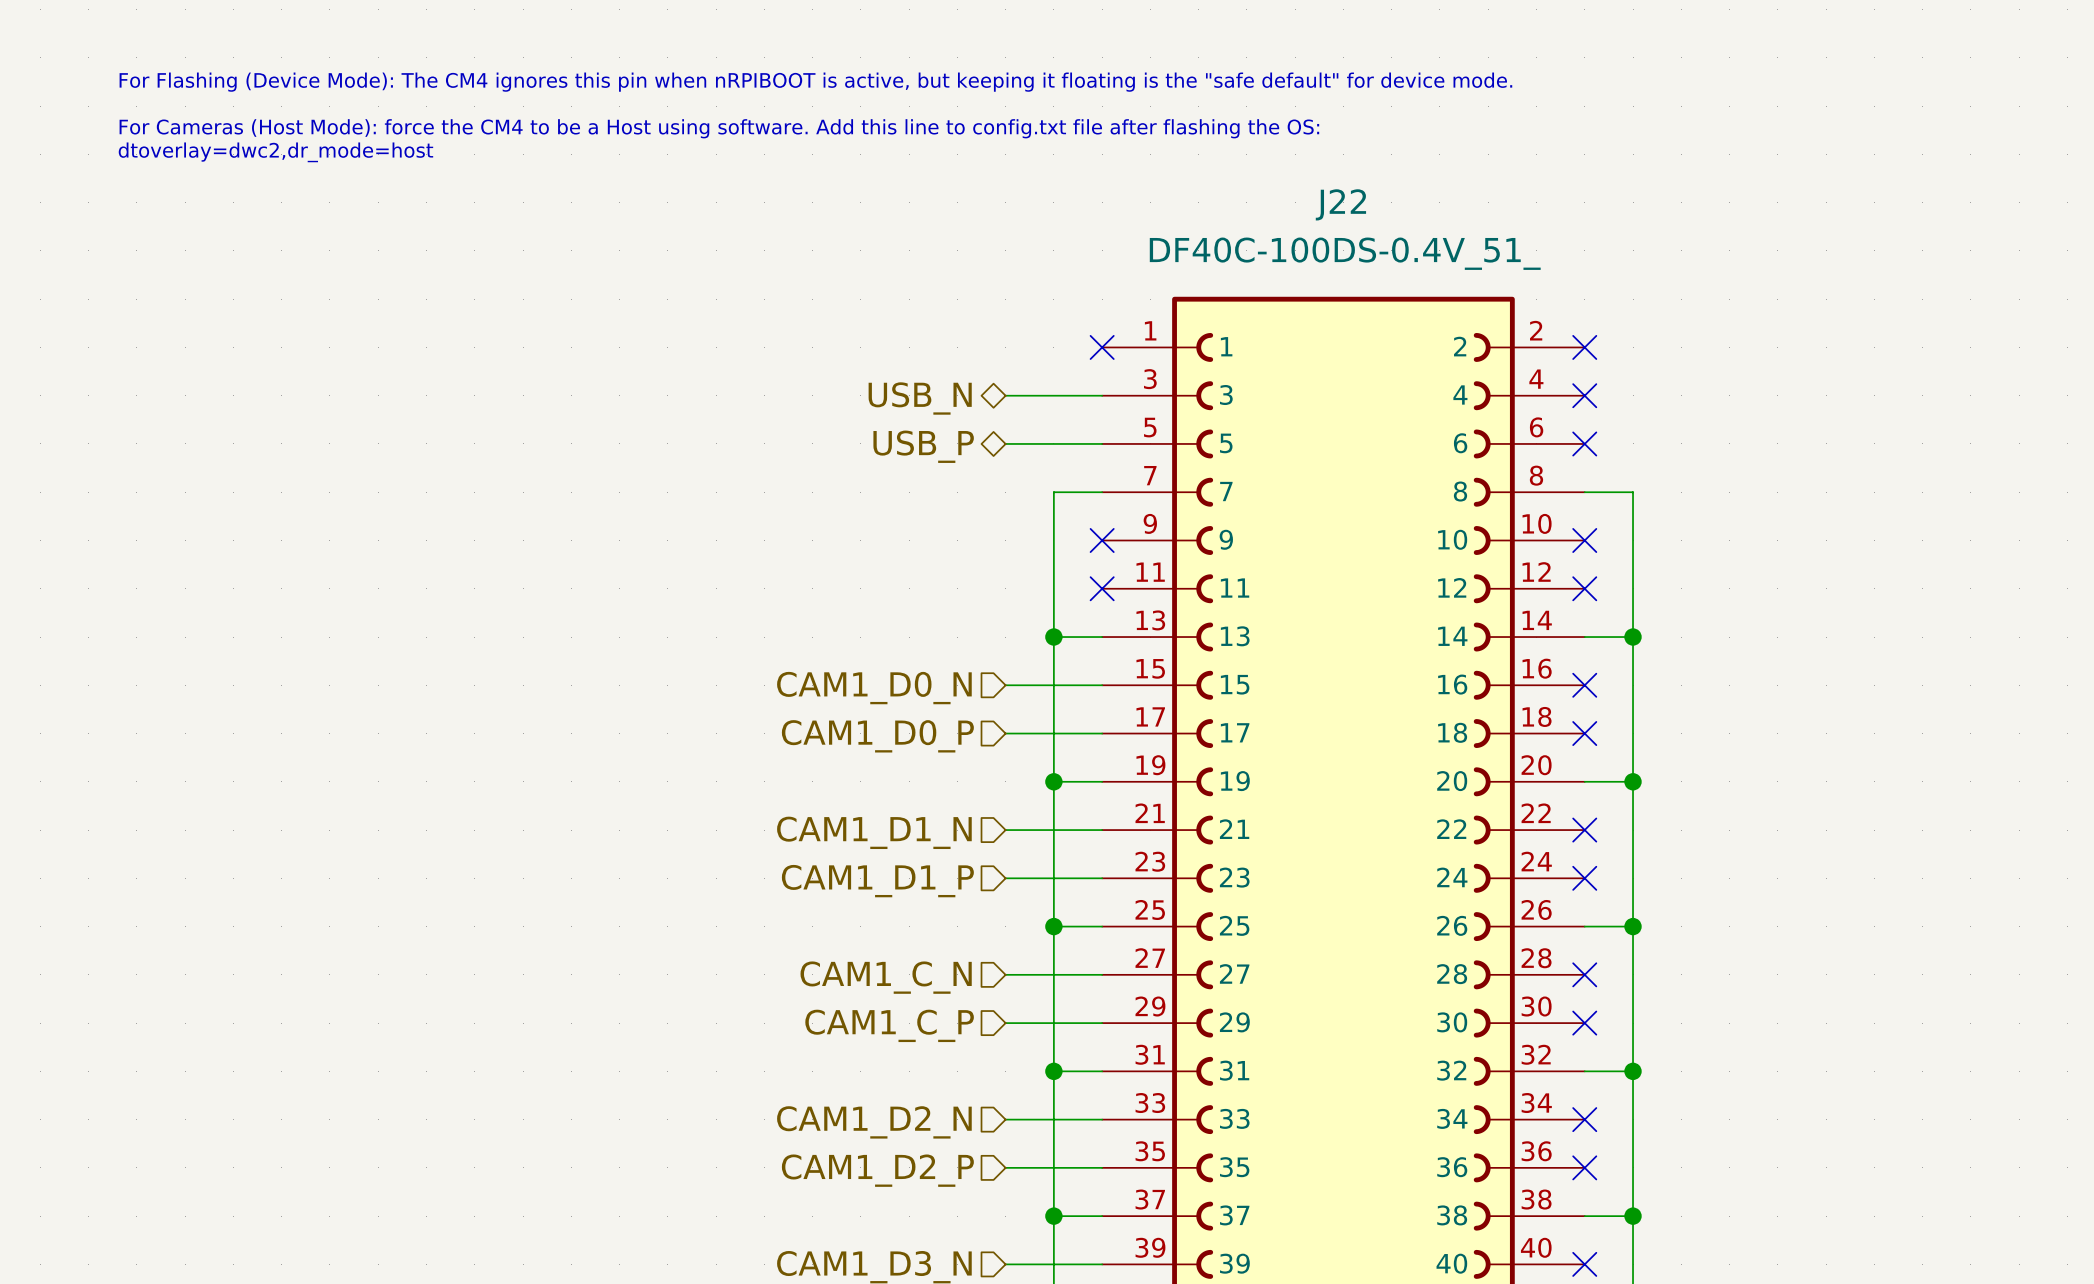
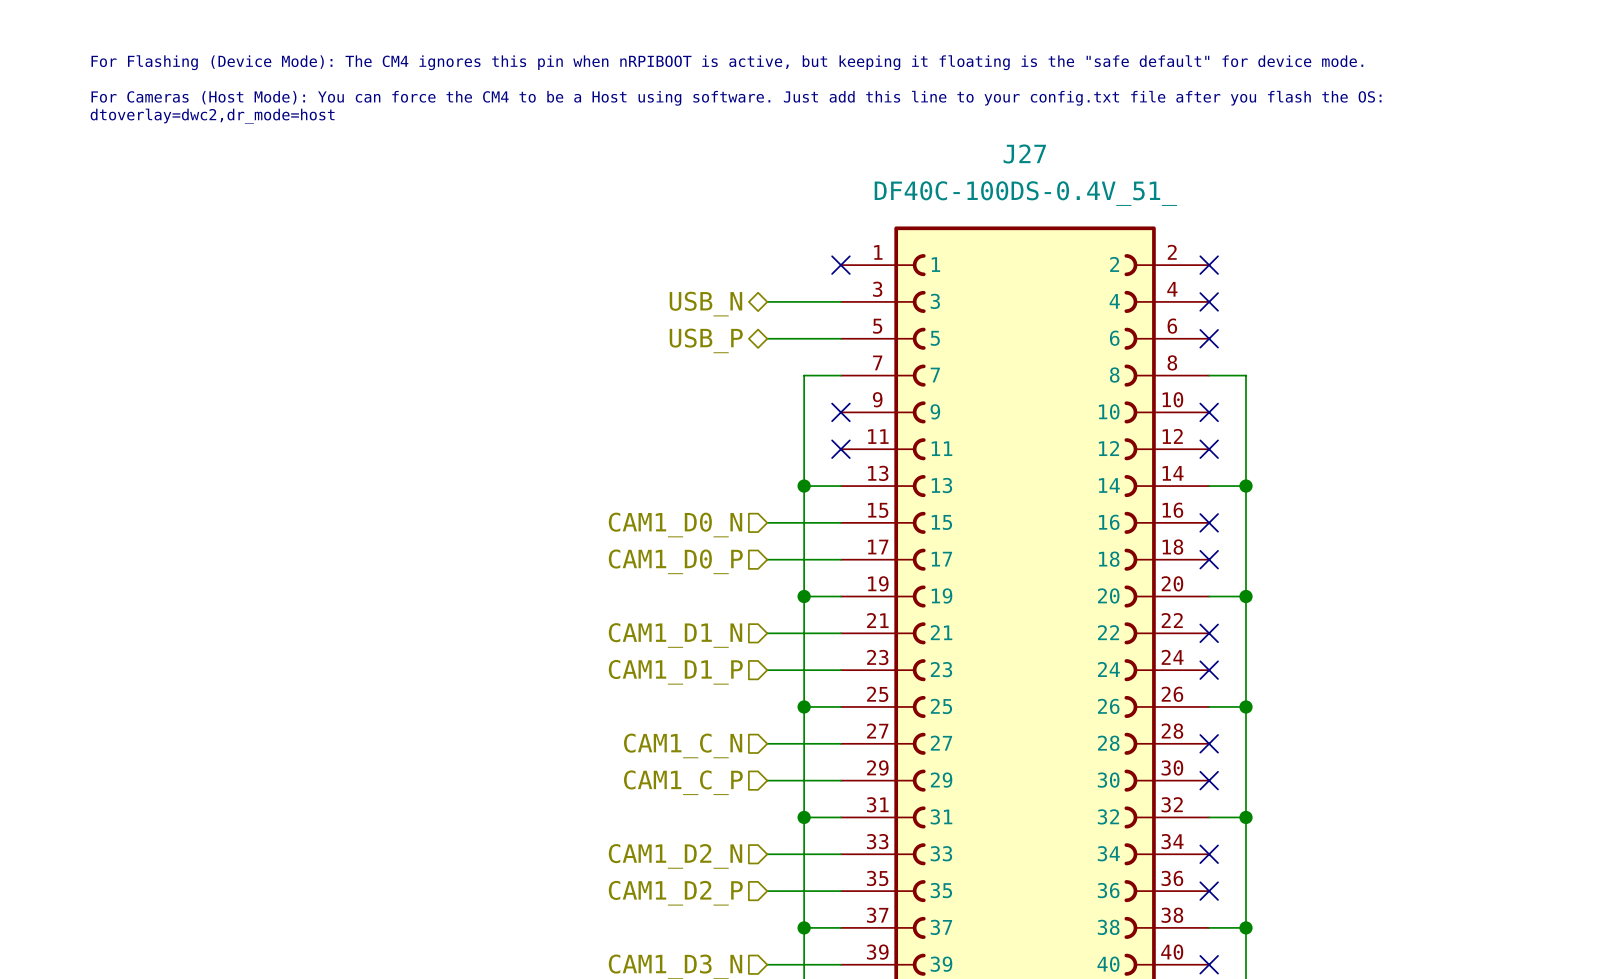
text: For Cameras (Host Mode): force the CM4 to be a Host using software. Add this line to config.txt file after flashing the OS: (719, 128) -> For Cameras (Host Mode): You can force the CM4 to be a Host using software. Just add this line to your config.txt file after you flash the OS: (736, 98)
J22 name: J22 (1340, 204) -> J27 (1024, 153)

